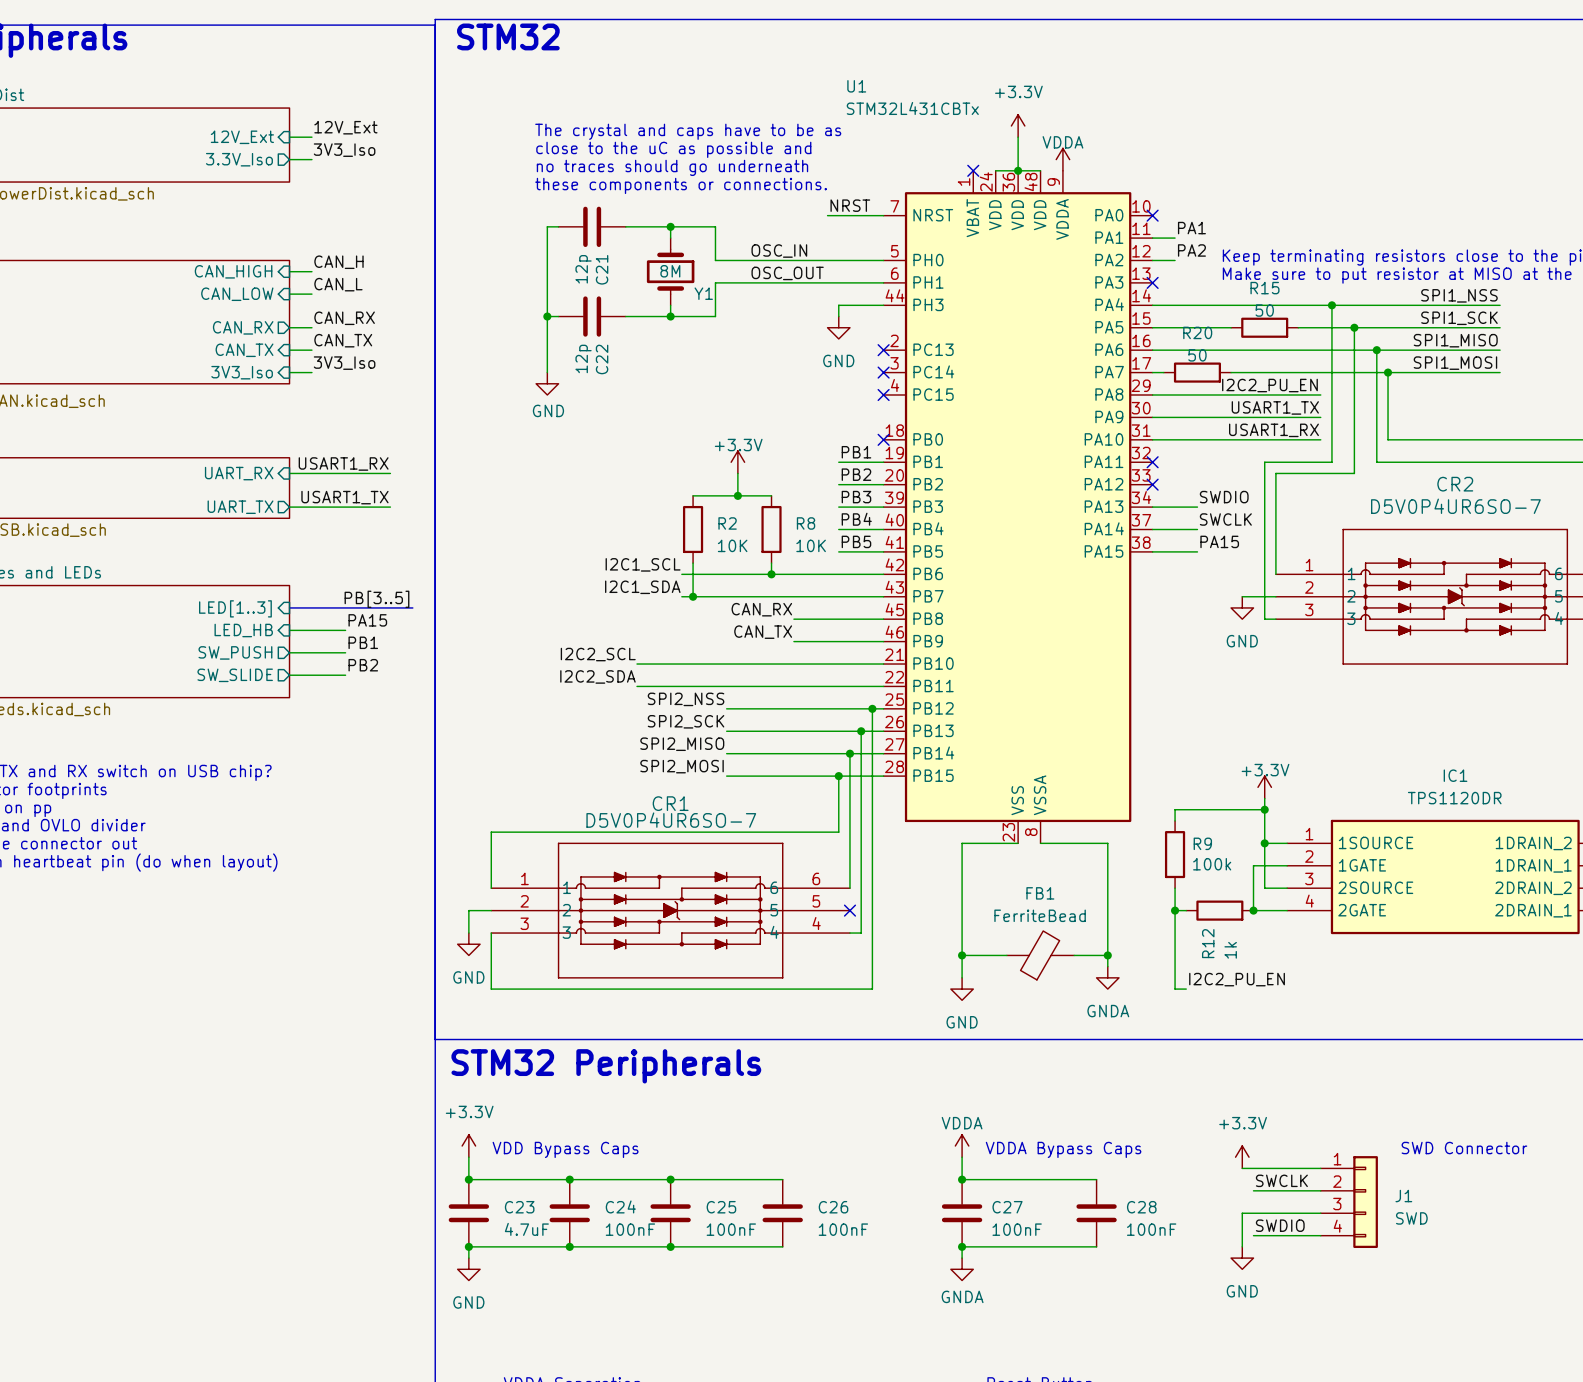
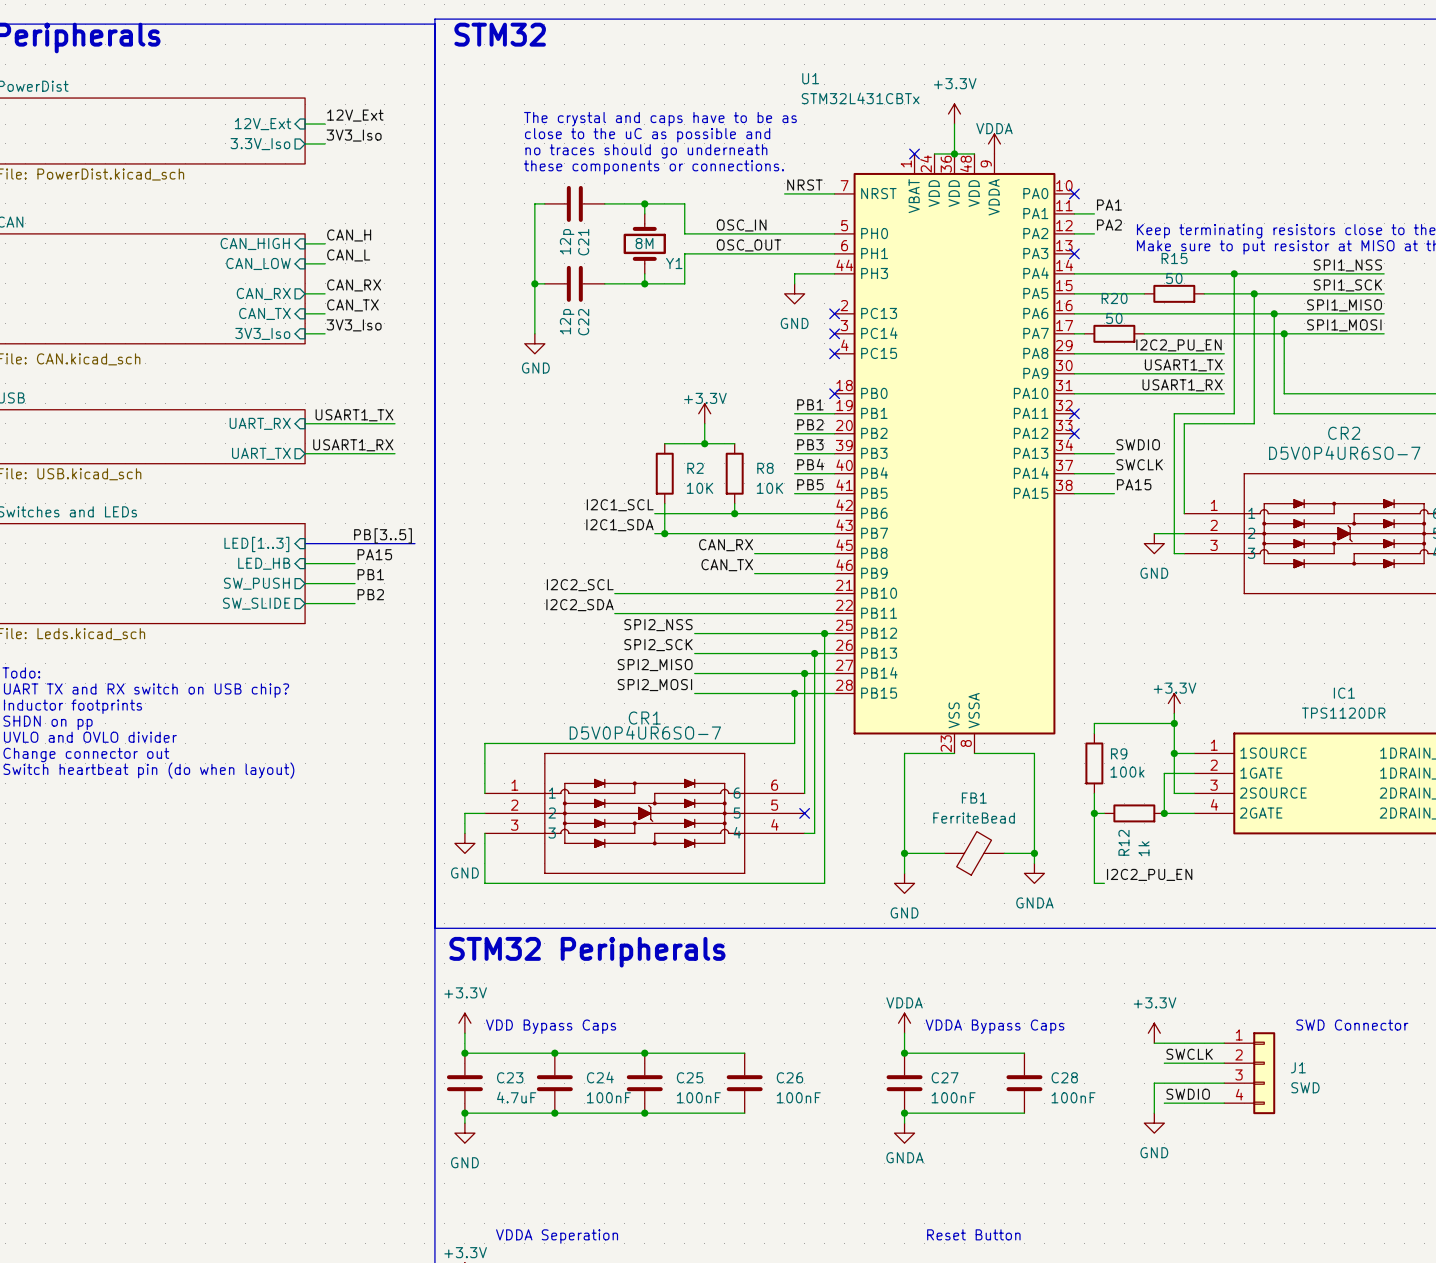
label: USART1_RX (343, 463) -> USART1_TX (354, 415)
label: USART1_TX (344, 497) -> USART1_RX (353, 445)

